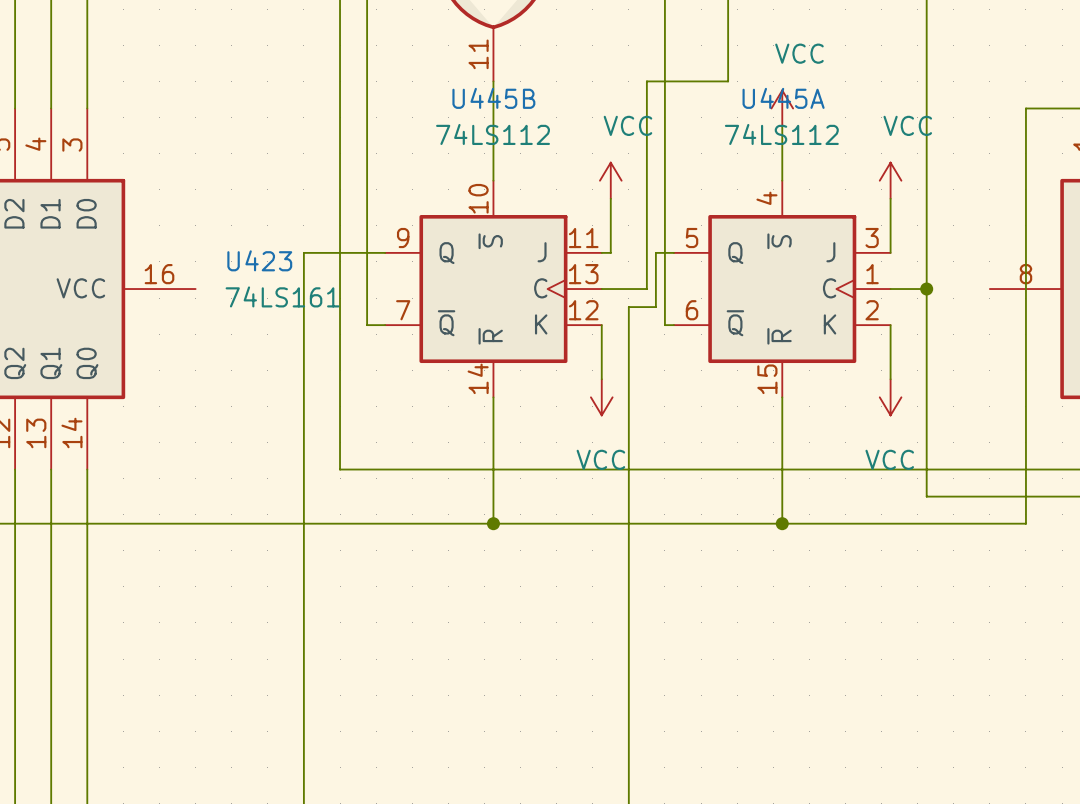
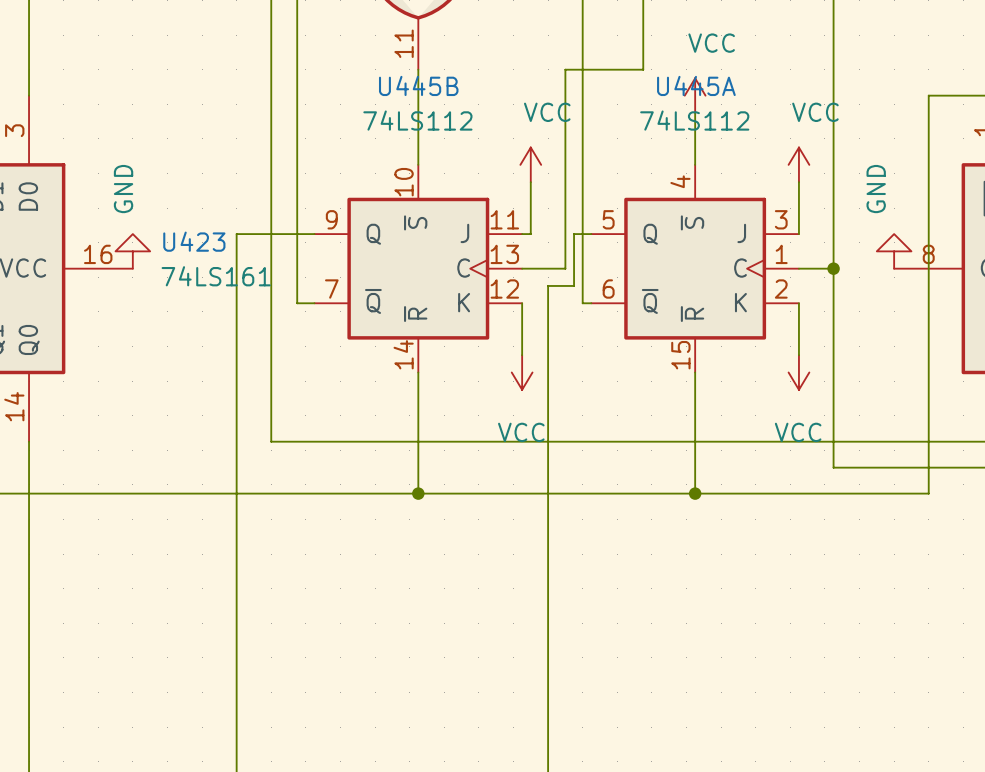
power symbol: none -> GND (132, 251)
power symbol: none -> GND (894, 251)

